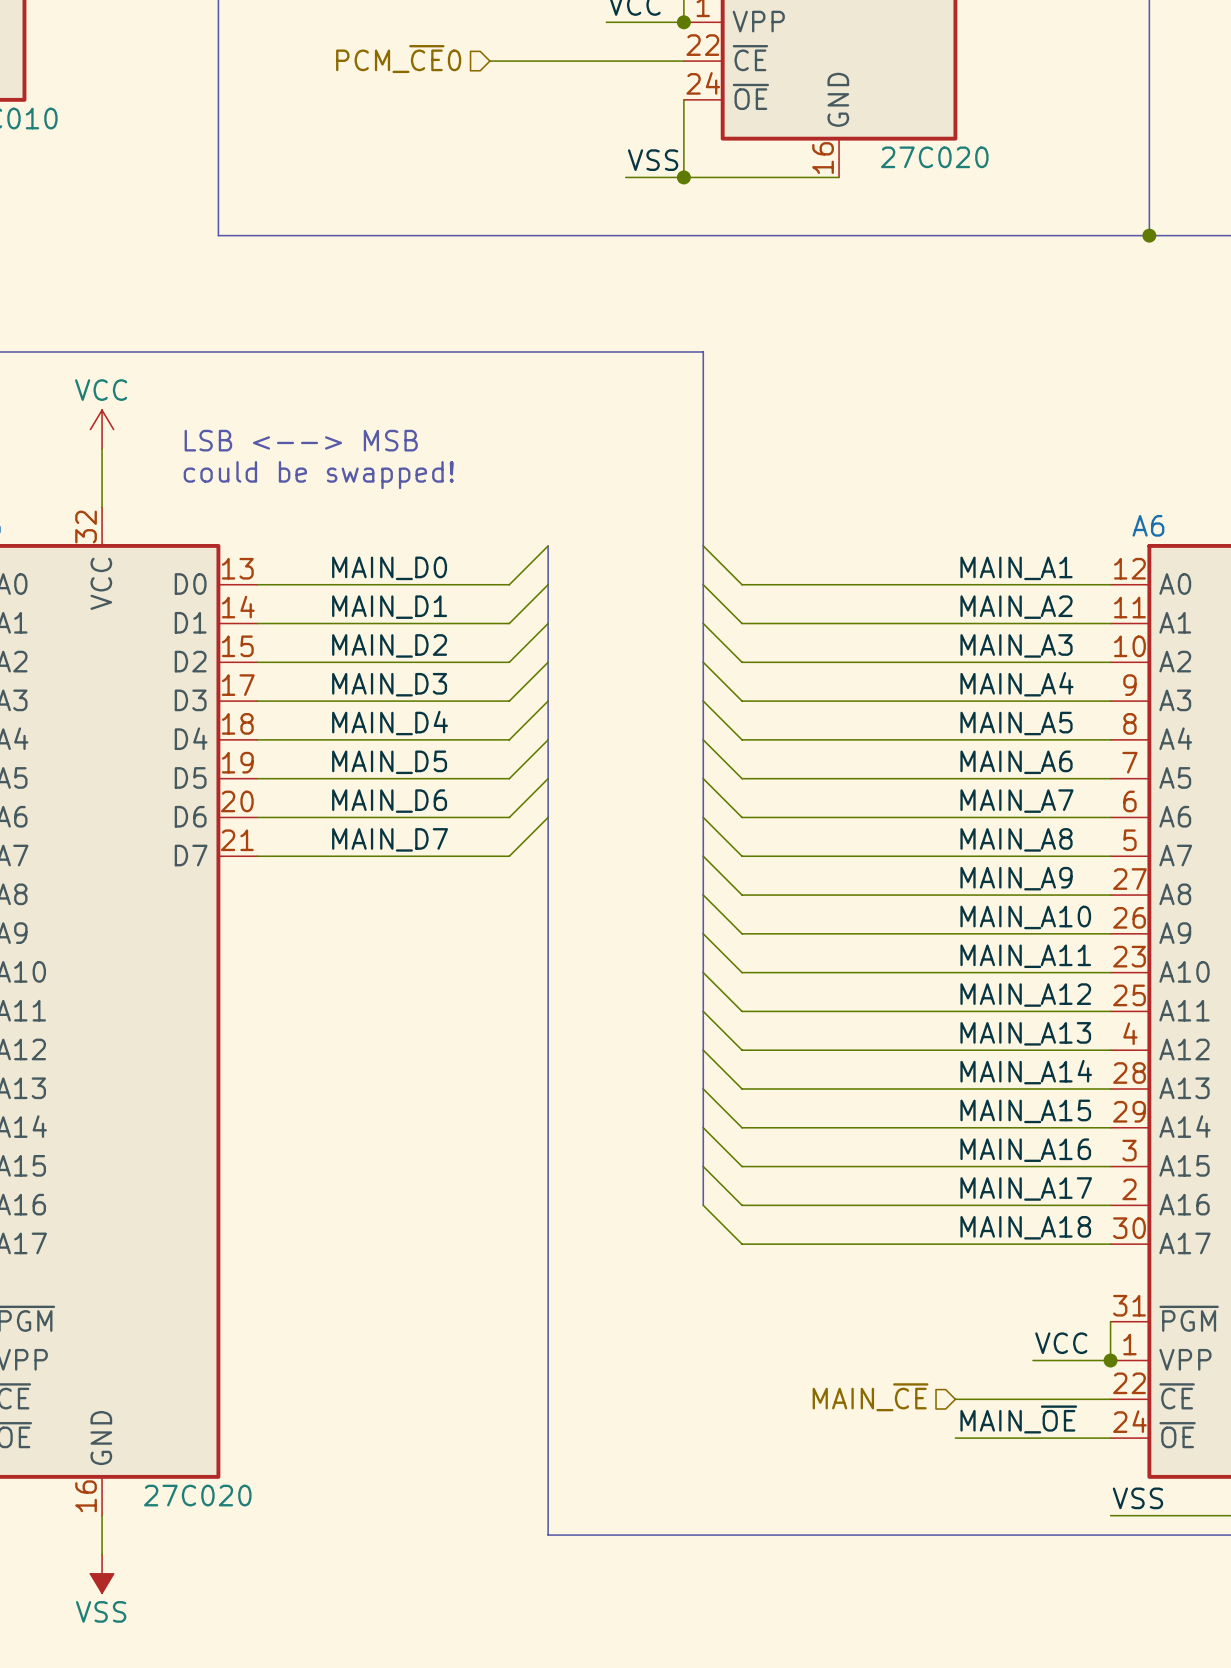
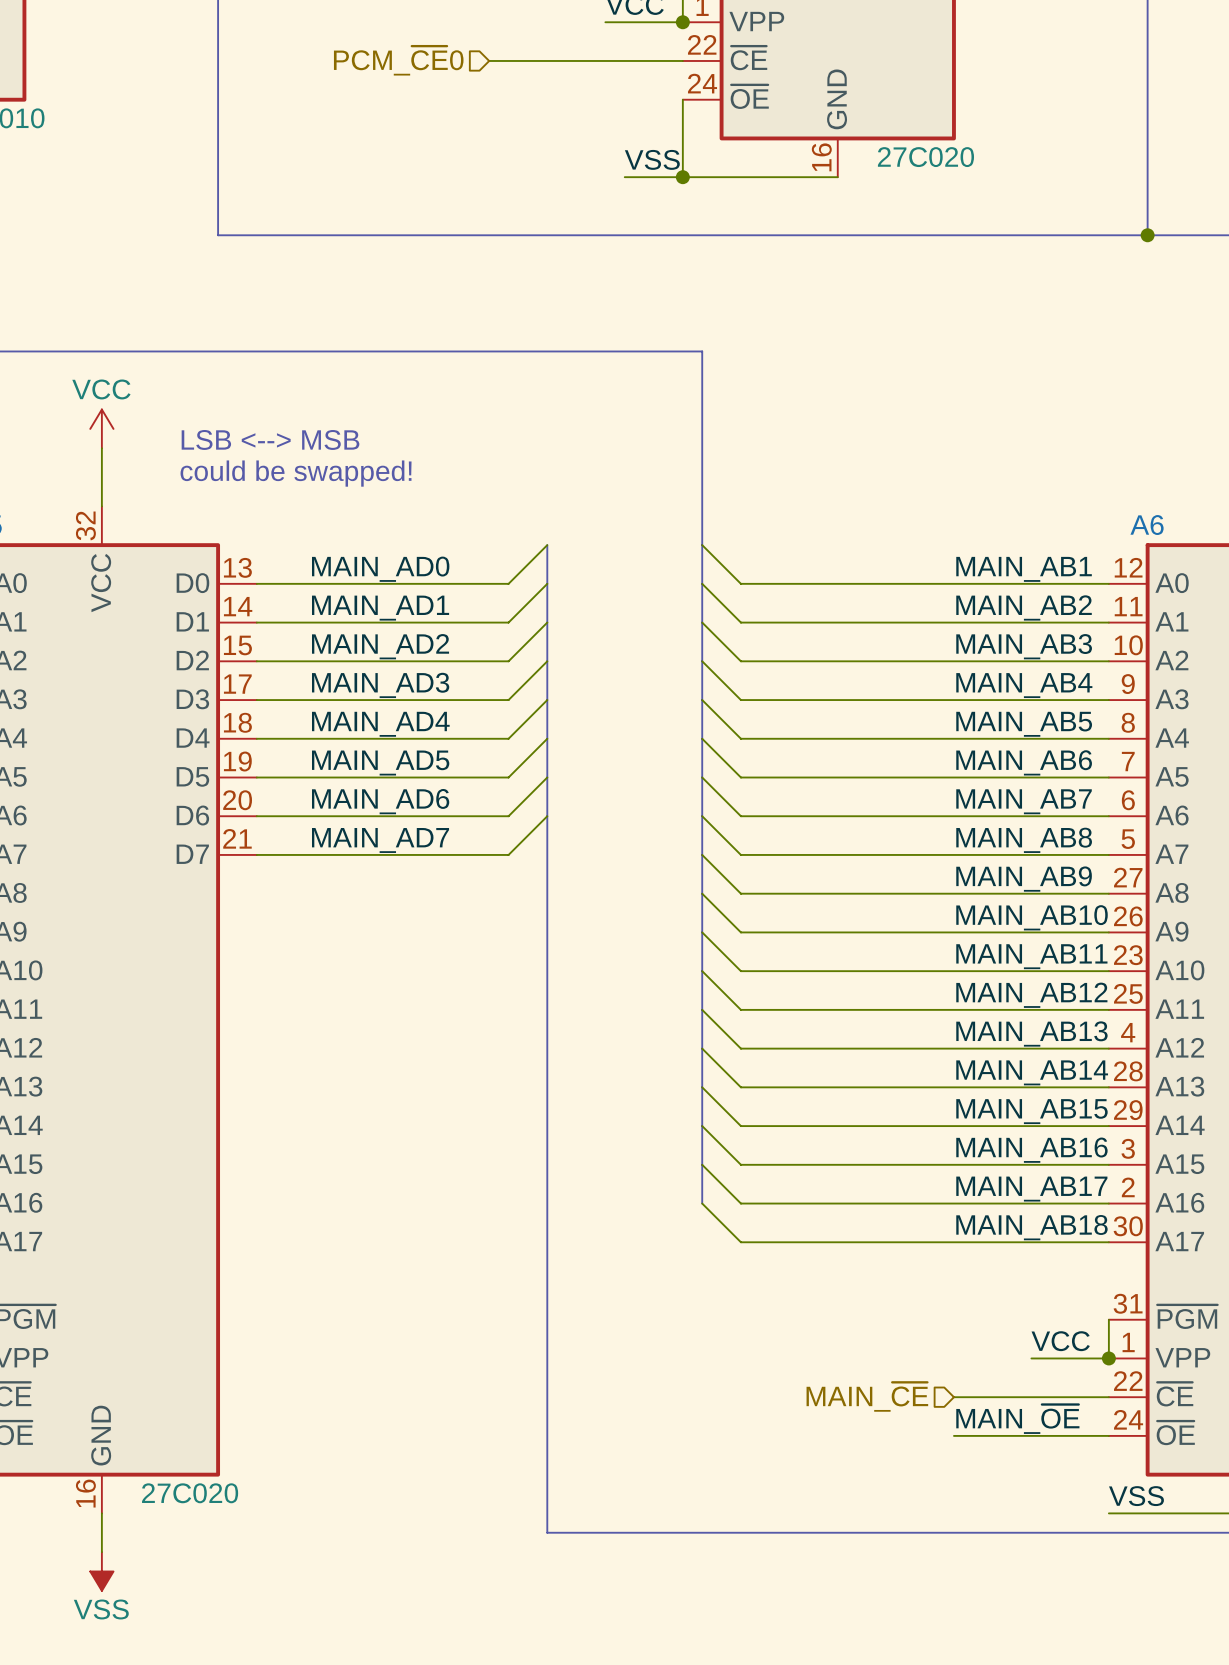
label: MAIN_D0 (389, 568) -> MAIN_AD0 (380, 569)
label: MAIN_A1 (1016, 568) -> MAIN_AB1 (1024, 569)
label: MAIN_D1 (389, 607) -> MAIN_AD1 (380, 608)
label: MAIN_A2 (1016, 607) -> MAIN_AB2 (1024, 607)
label: MAIN_D2 (389, 645) -> MAIN_AD2 (380, 646)
label: MAIN_A3 (1016, 645) -> MAIN_AB3 (1024, 646)
label: MAIN_D3 (389, 684) -> MAIN_AD3 (380, 685)
label: MAIN_A4 (1016, 684) -> MAIN_AB4 (1024, 685)
label: MAIN_D4 (390, 723) -> MAIN_AD4 (380, 724)
label: MAIN_A5 (1016, 723) -> MAIN_AB5 (1024, 724)
label: MAIN_D5 (389, 762) -> MAIN_AD5 (380, 763)
label: MAIN_A6 (1016, 762) -> MAIN_AB6 (1024, 762)
label: MAIN_D6 (389, 801) -> MAIN_AD6 (380, 801)
label: MAIN_A7 (1016, 801) -> MAIN_AB7 (1024, 801)
label: MAIN_D7 (390, 839) -> MAIN_AD7 (380, 840)
label: MAIN_A8 (1016, 839) -> MAIN_AB8 (1024, 840)
label: MAIN_A9 (1016, 878) -> MAIN_AB9 (1024, 879)
label: MAIN_A10 (1025, 917) -> MAIN_AB10 (1032, 917)
label: MAIN_A11 (1025, 956) -> MAIN_AB11 (1031, 956)
label: MAIN_A12 (1025, 995) -> MAIN_AB12 (1031, 995)
label: MAIN_A13 (1025, 1033) -> MAIN_AB13 (1031, 1033)
label: MAIN_A14 (1026, 1072) -> MAIN_AB14 (1032, 1072)
label: MAIN_A15 (1025, 1111) -> MAIN_AB15 (1031, 1111)
label: MAIN_A16 (1025, 1150) -> MAIN_AB16 (1031, 1150)
label: MAIN_A17 (1026, 1188) -> MAIN_AB17 (1031, 1189)
label: MAIN_A18 (1025, 1227) -> MAIN_AB18 (1031, 1227)

